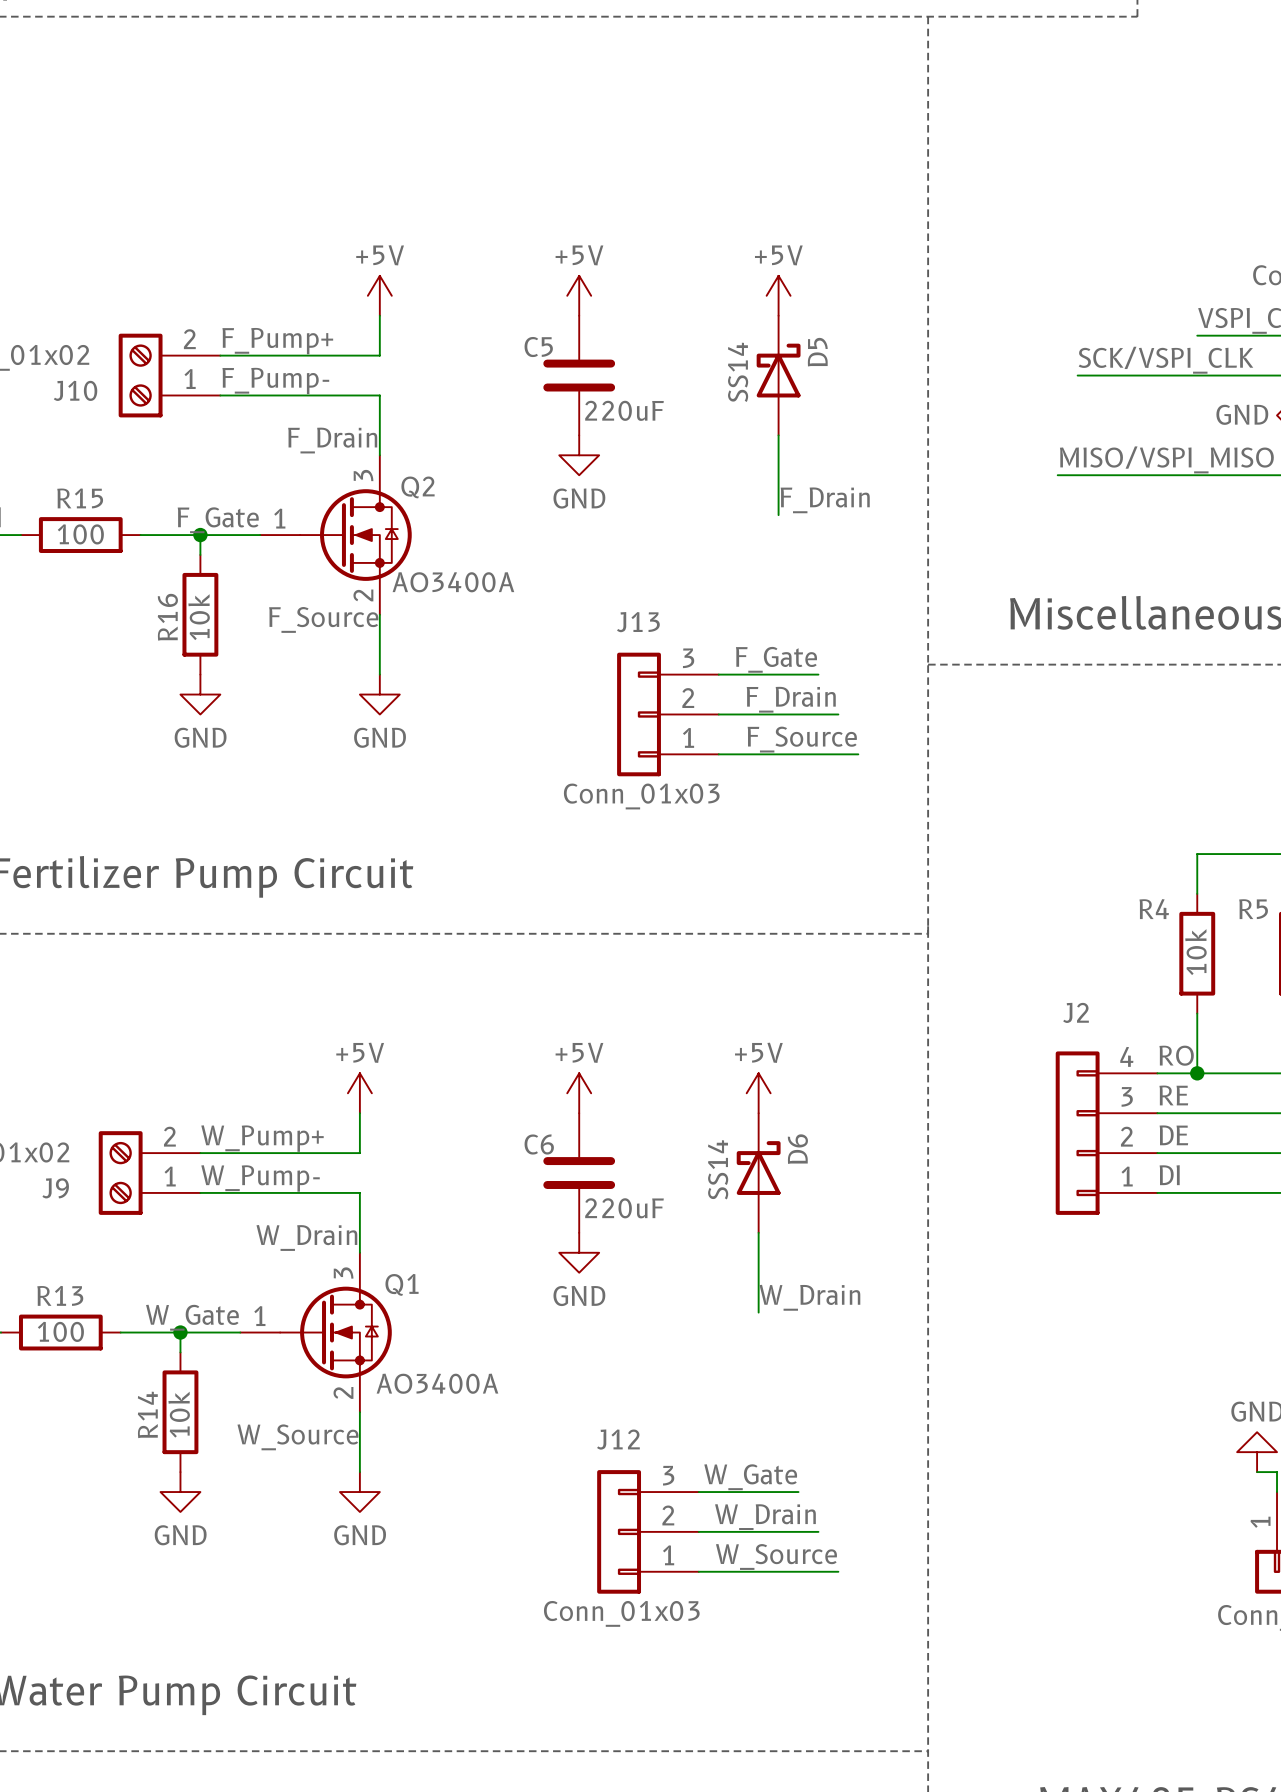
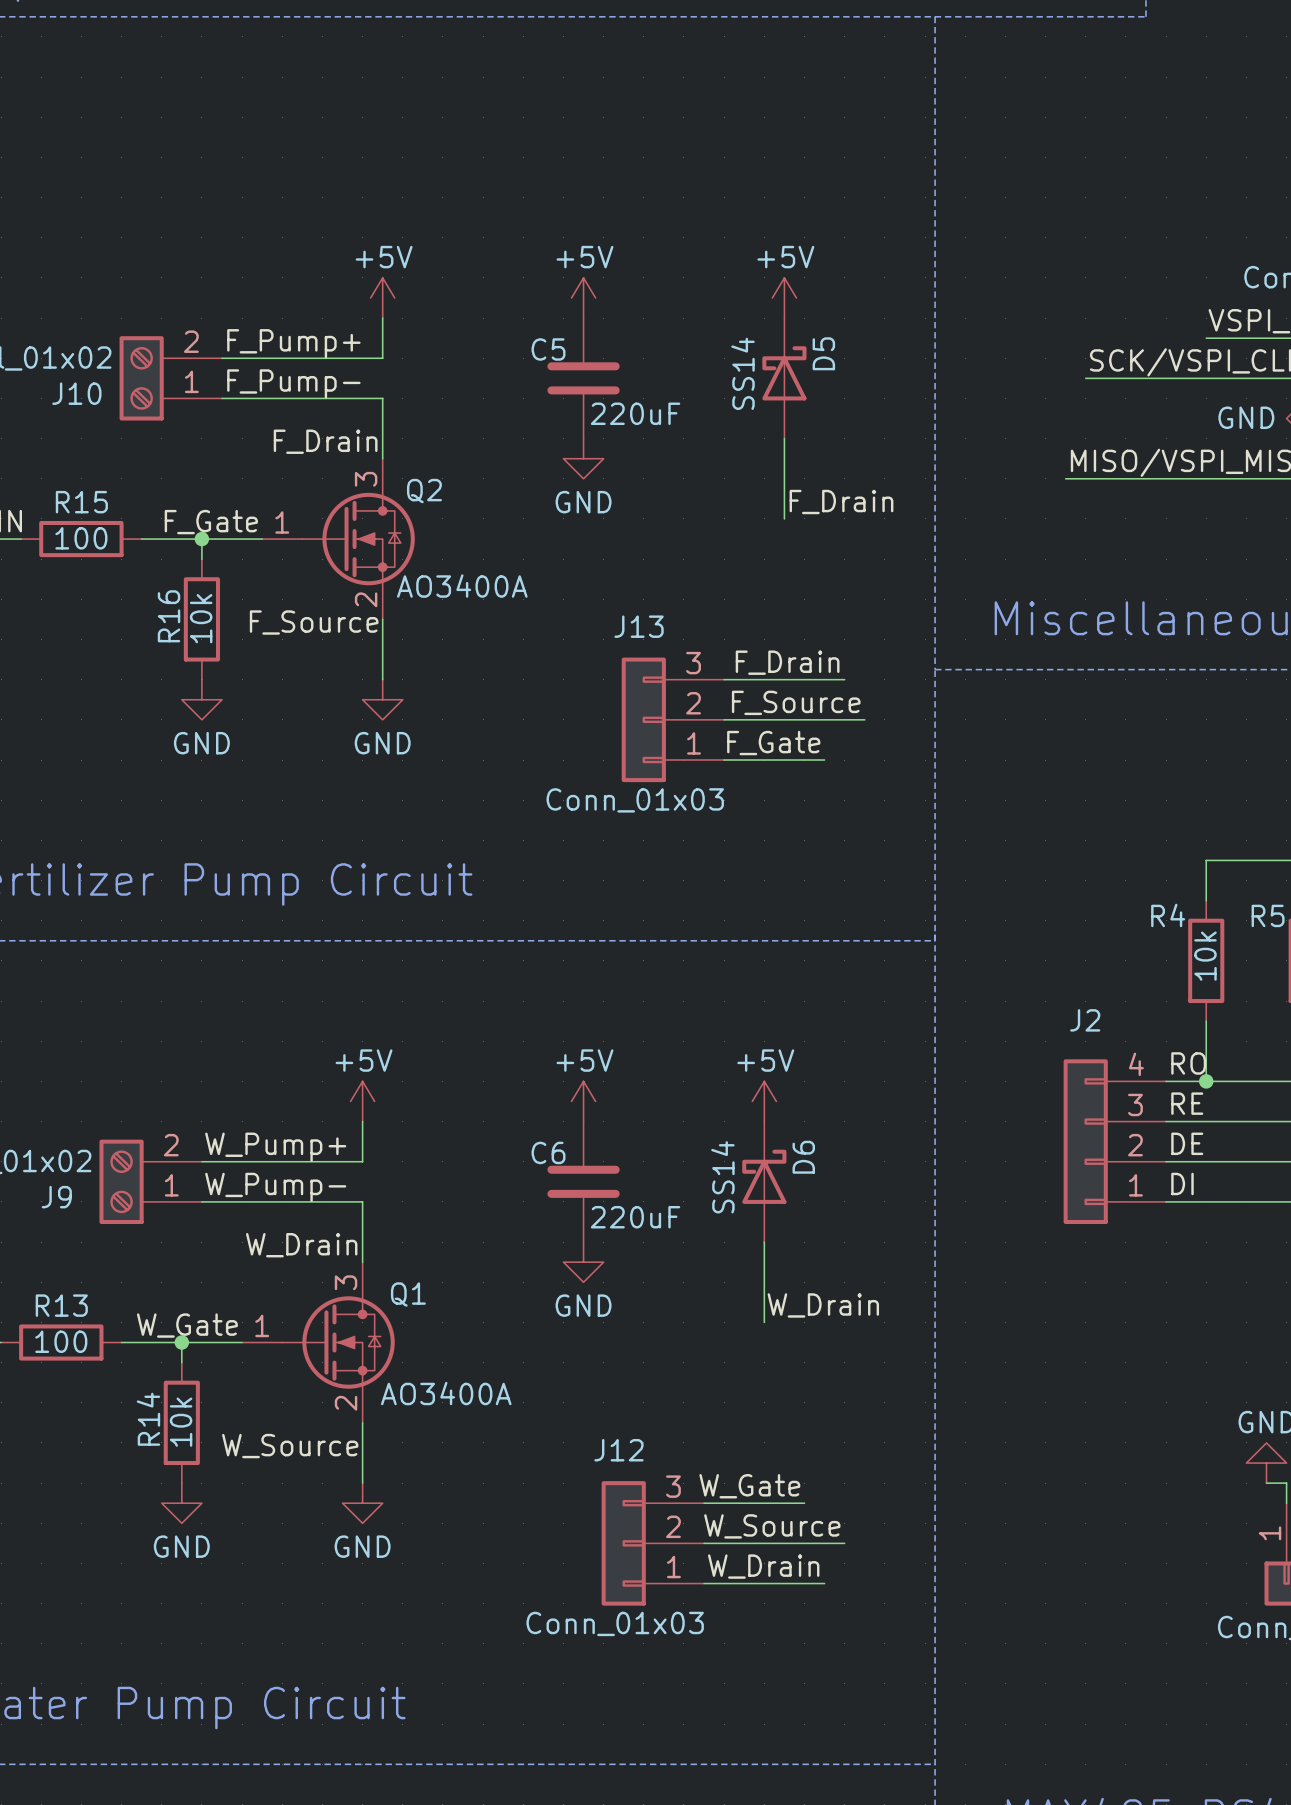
label position: F_Gate (776, 659) -> F_Gate (773, 743)
wire: none -> (824, 679) (844, 679)
label position: F_Drain (791, 699) -> F_Drain (787, 662)
wire: none -> (844, 719) (864, 719)
label position: F_Source (802, 739) -> F_Source (796, 702)
wire: (818, 754) (858, 754) -> none
label position: W_Drain (765, 1517) -> W_Drain (763, 1566)
label position: W_Source (776, 1556) -> W_Source (772, 1526)
wire: (818, 1571) (838, 1571) -> (824, 1543) (844, 1543)

